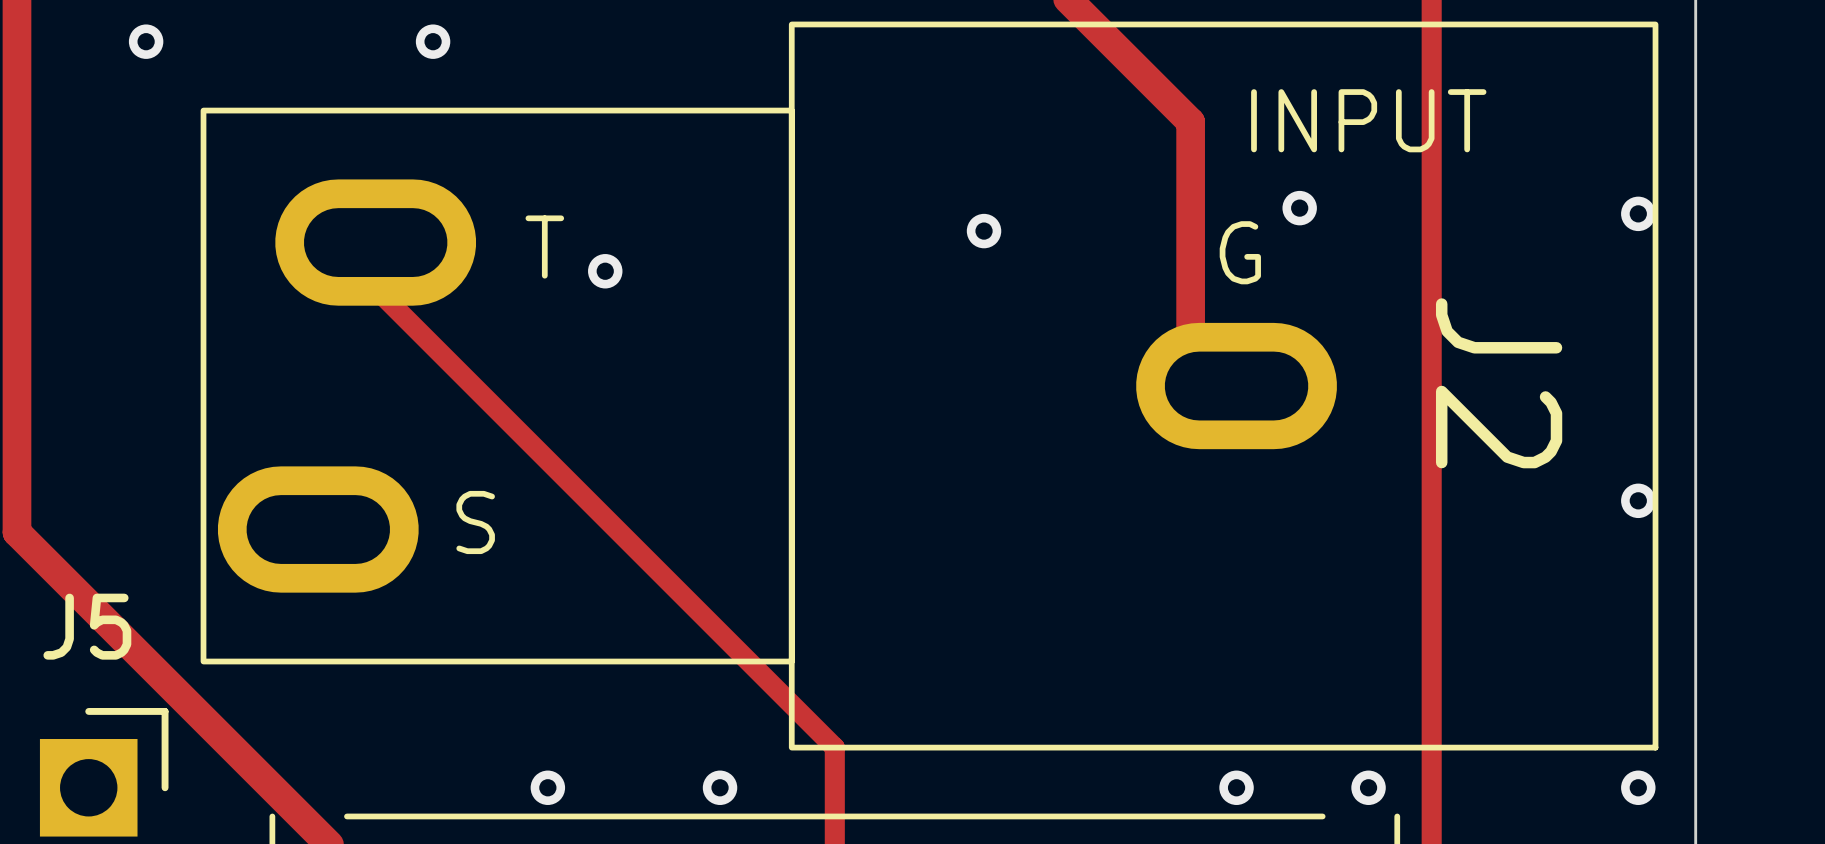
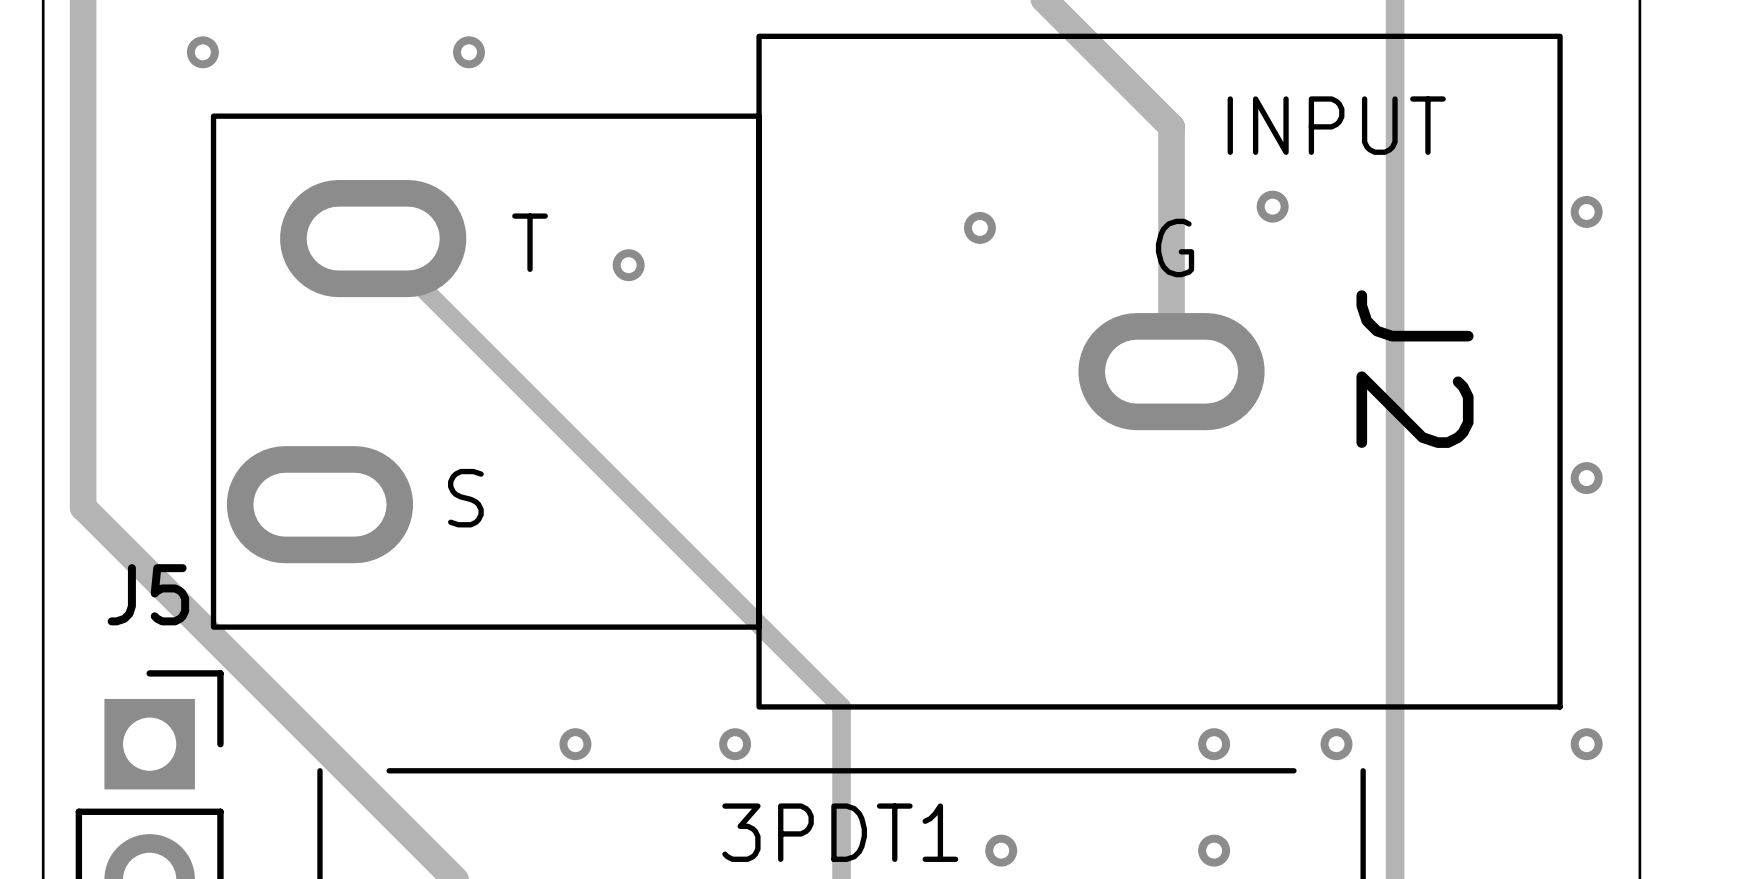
J2 position: (929, 386) -> (886, 371)

